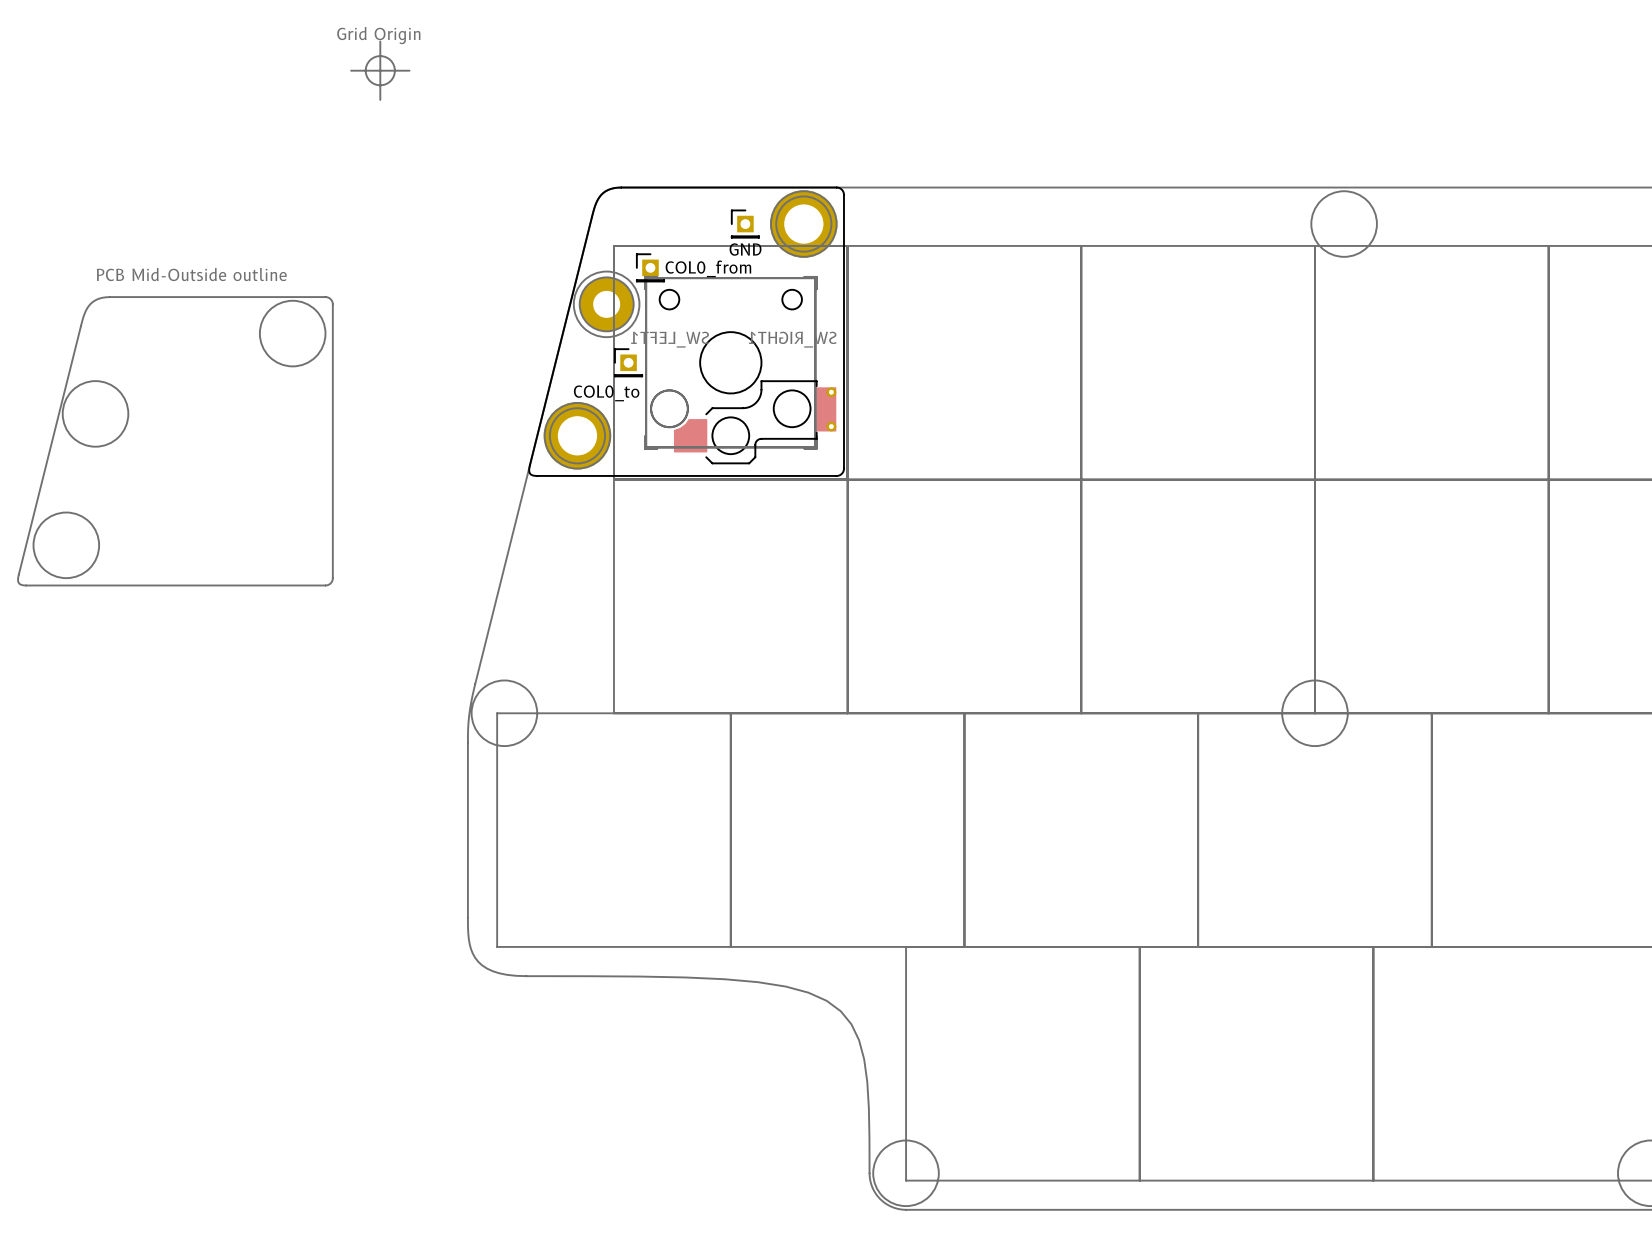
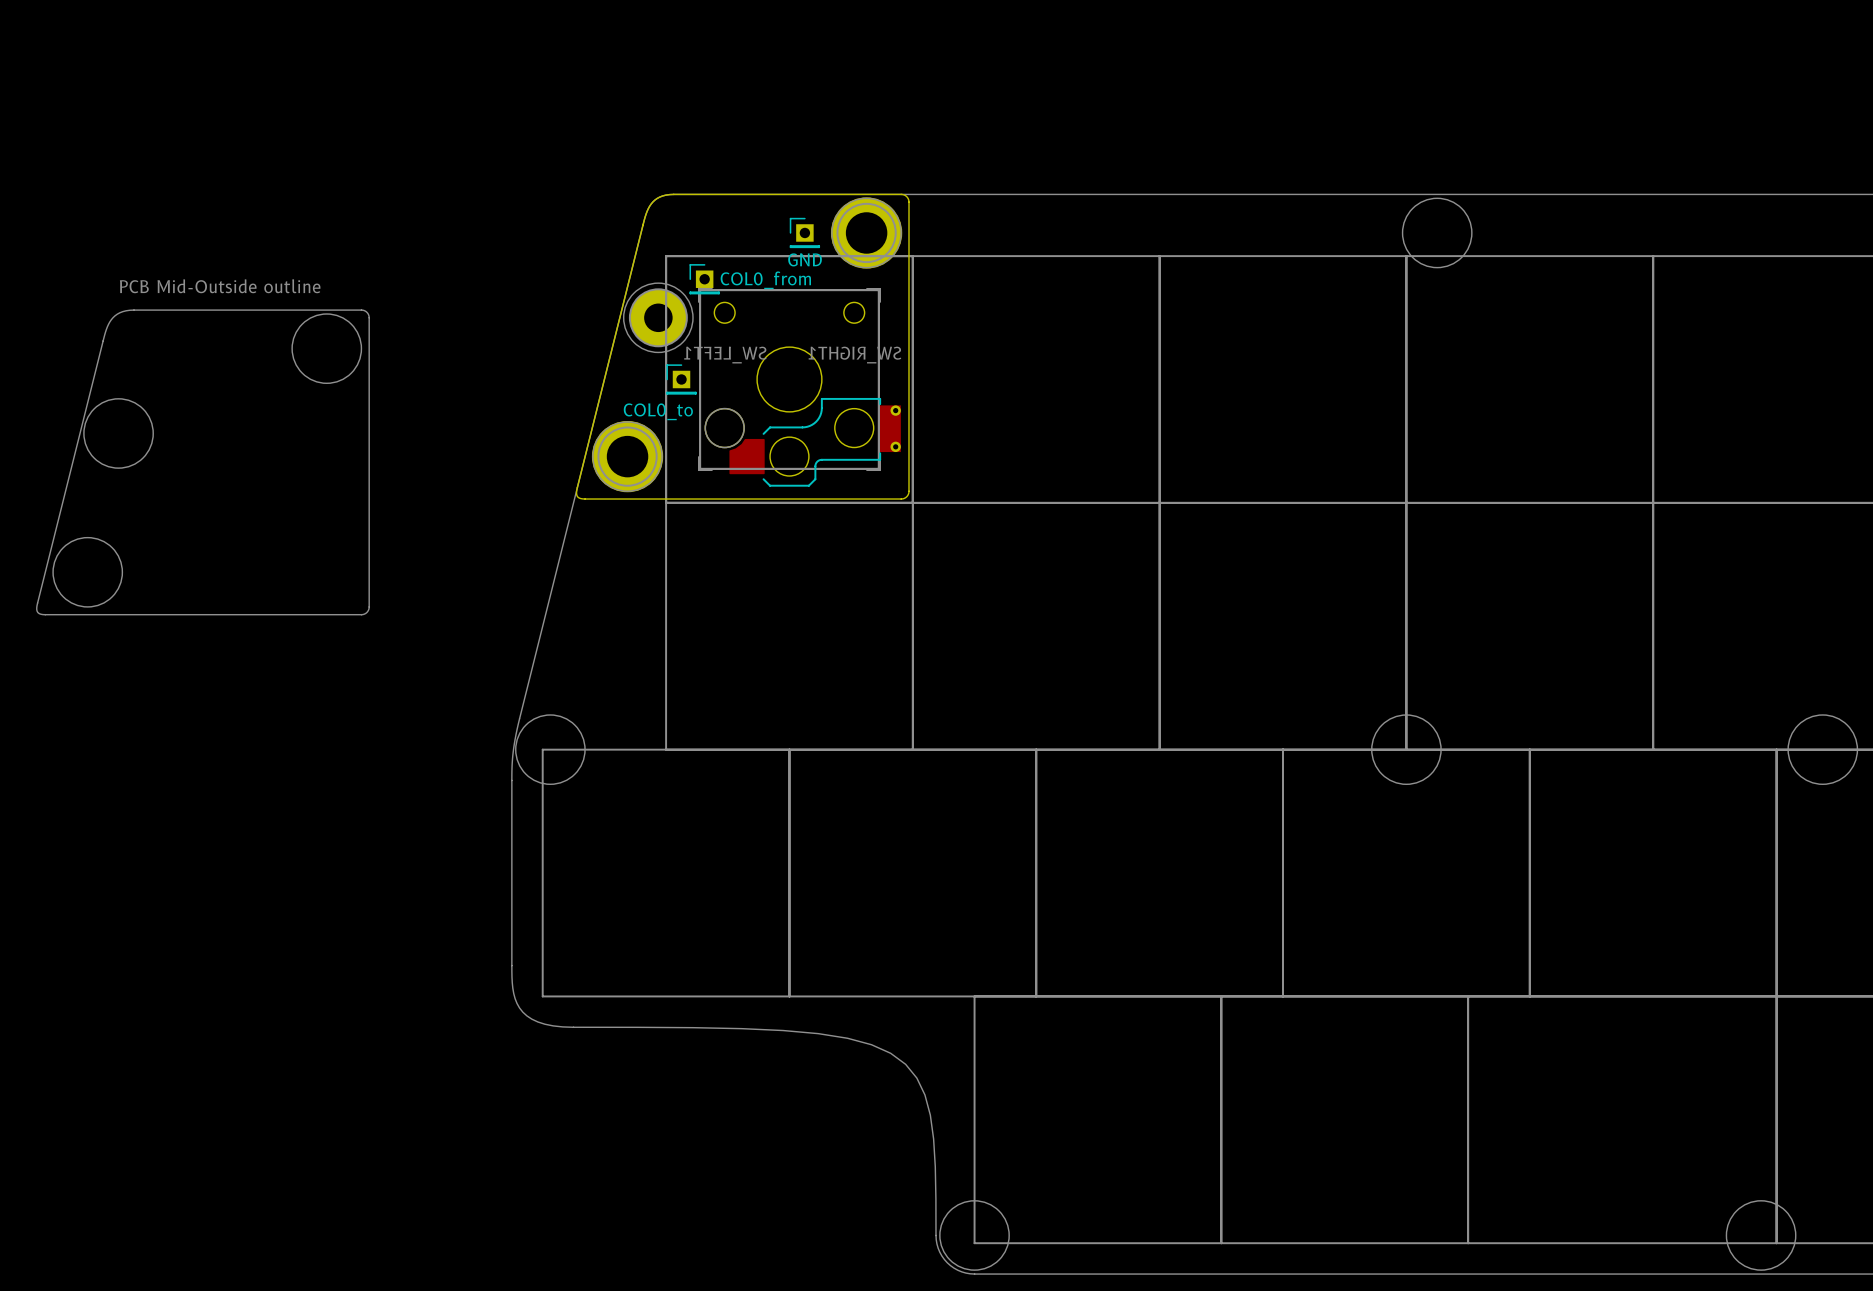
text: Grid Origin (378, 35) -> none
line: (380, 41) (380, 99) -> none
drawing: [365, 55, 396, 86] -> none
line: (351, 70) (409, 70) -> none

